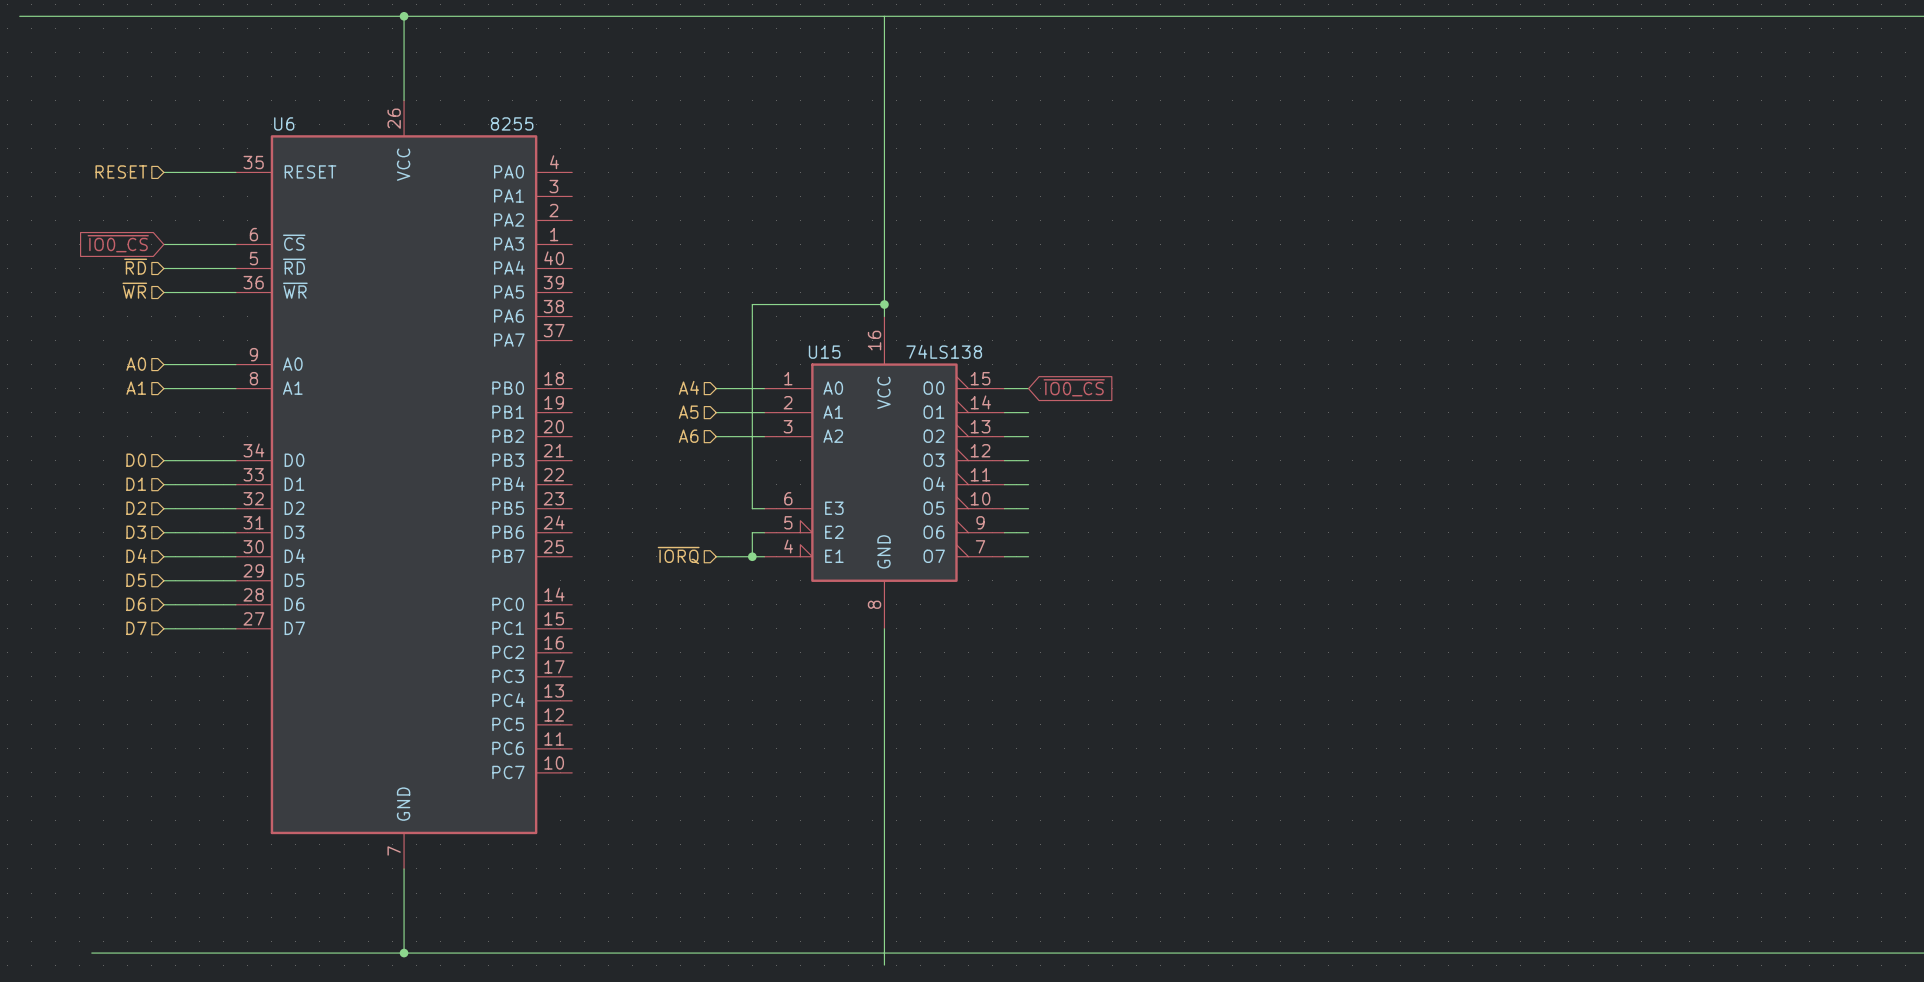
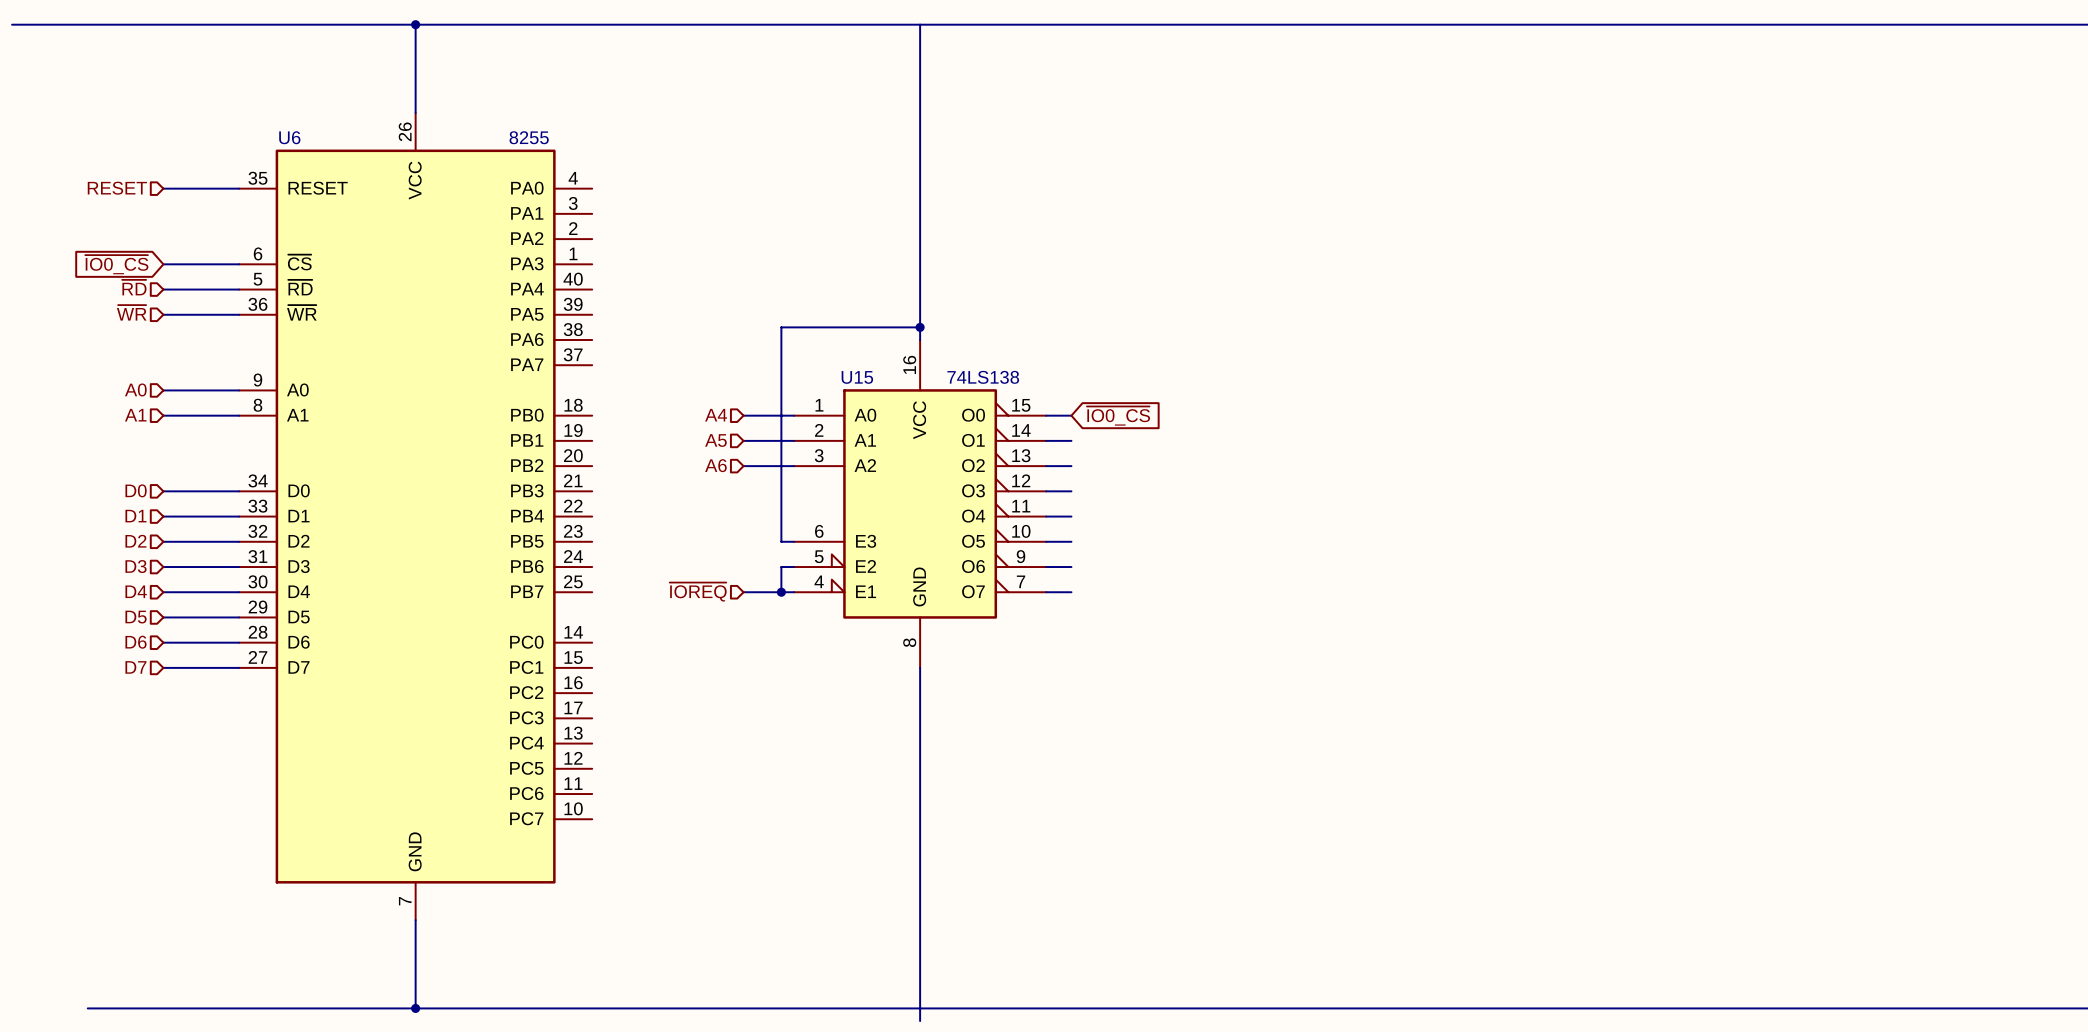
hierarchical label: ~{IORQ} (678, 555) -> ~{IOREQ} (698, 592)

